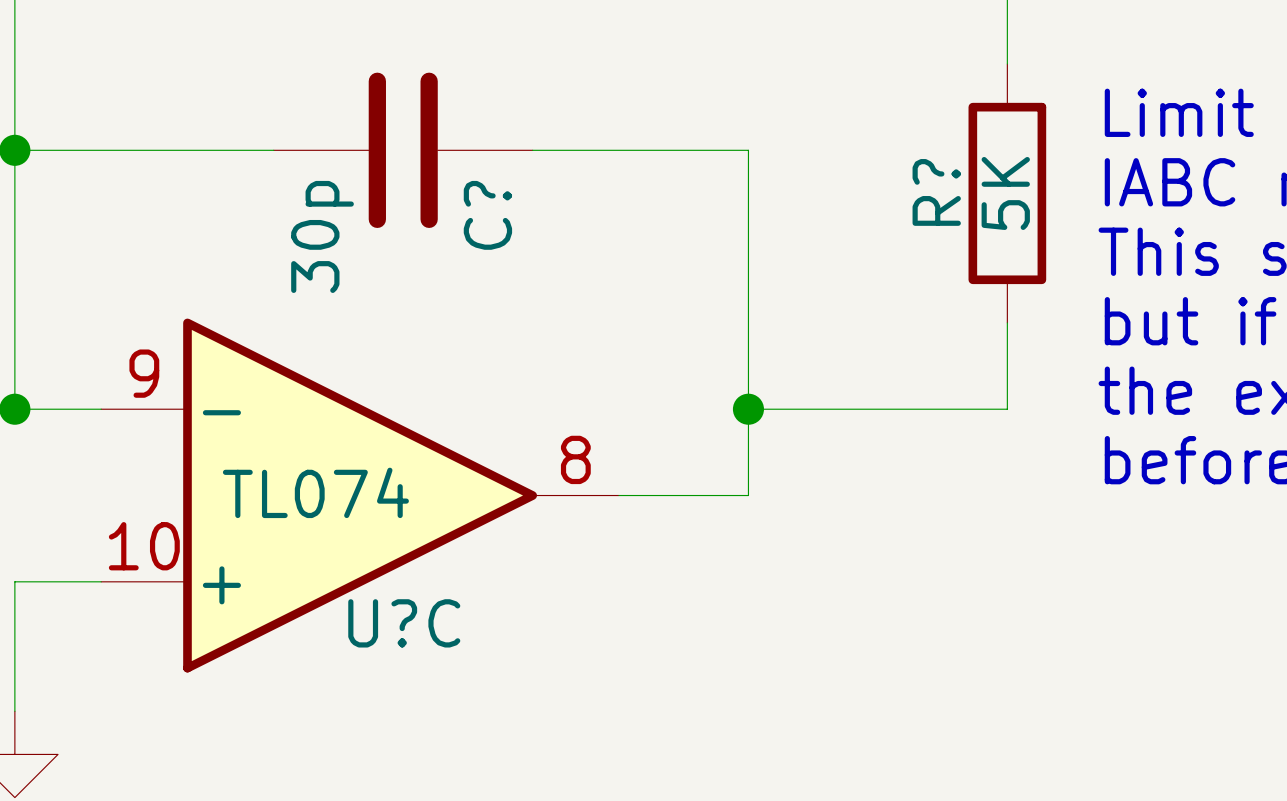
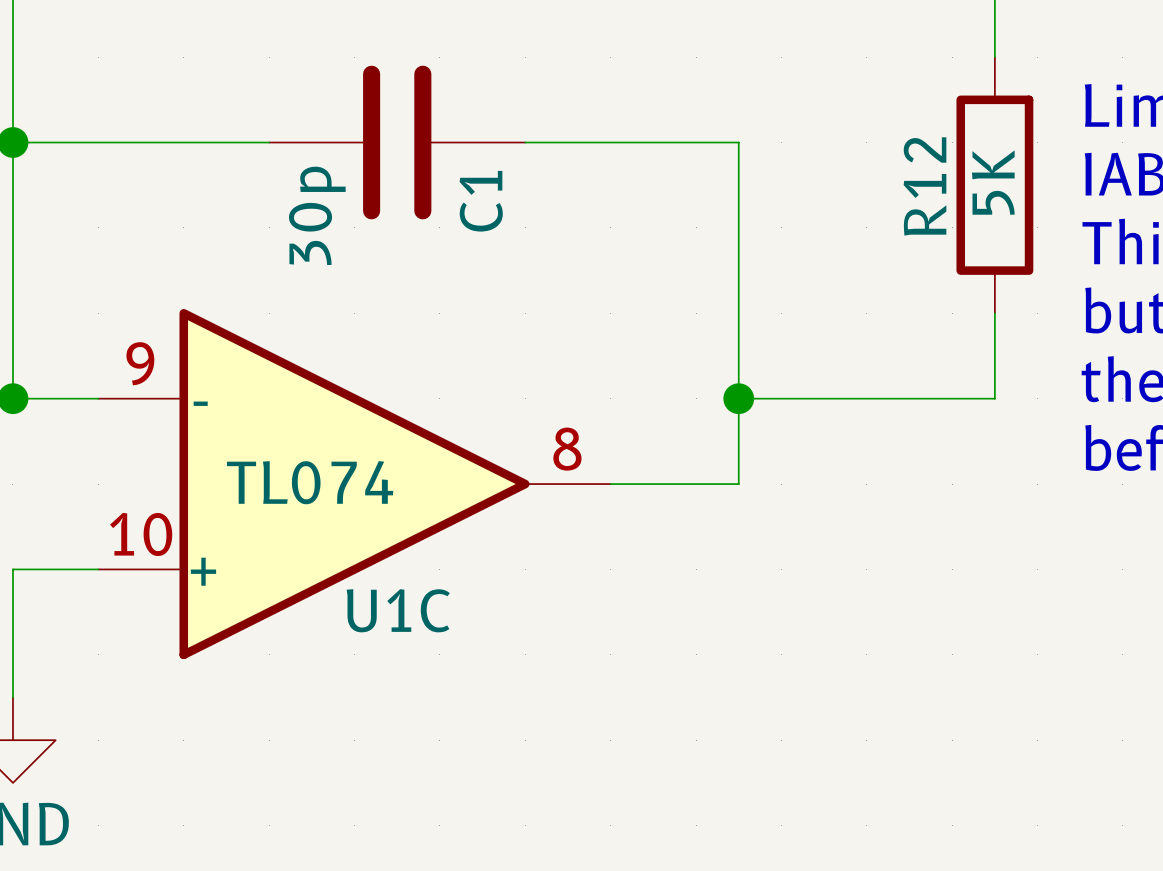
R? name: R? (936, 192) -> R12 (924, 186)
C? name: C? (487, 215) -> C1 (481, 201)
U?C name: U?C (404, 623) -> U1C (398, 610)

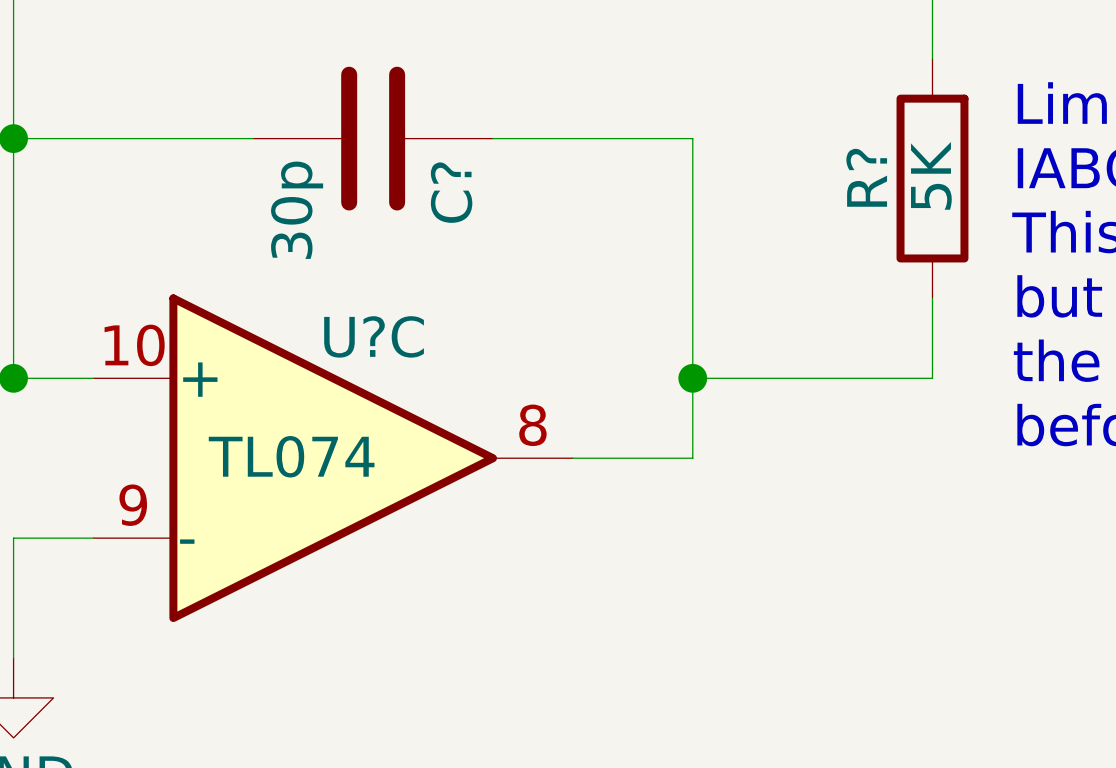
R12 name: R12 (924, 186) -> R? (866, 177)
C1 name: C1 (481, 201) -> C? (451, 192)
U1C flip: as is (354, 484) -> up-down (333, 458)
U1C name: U1C (398, 610) -> U?C (374, 336)

